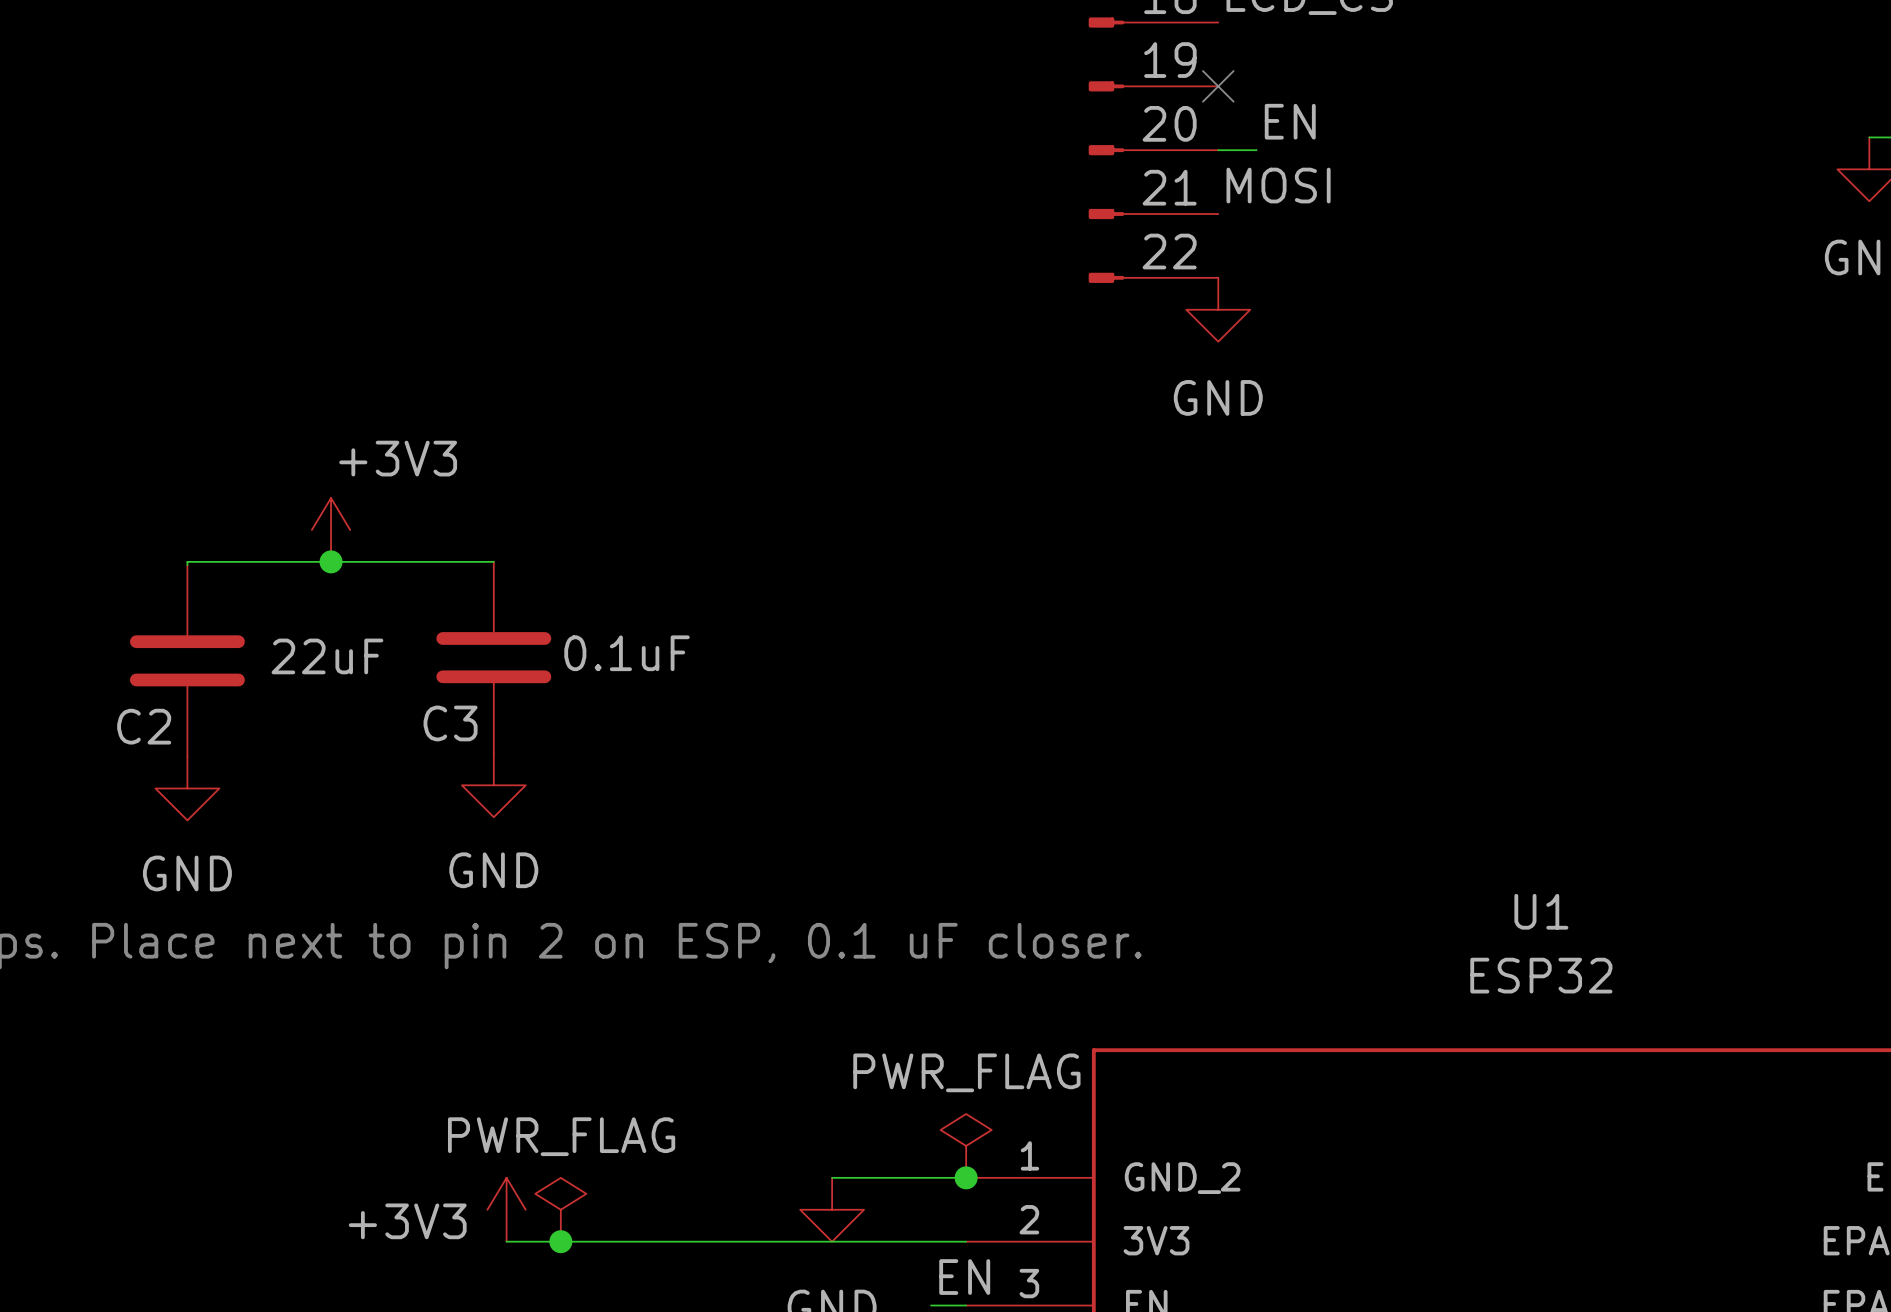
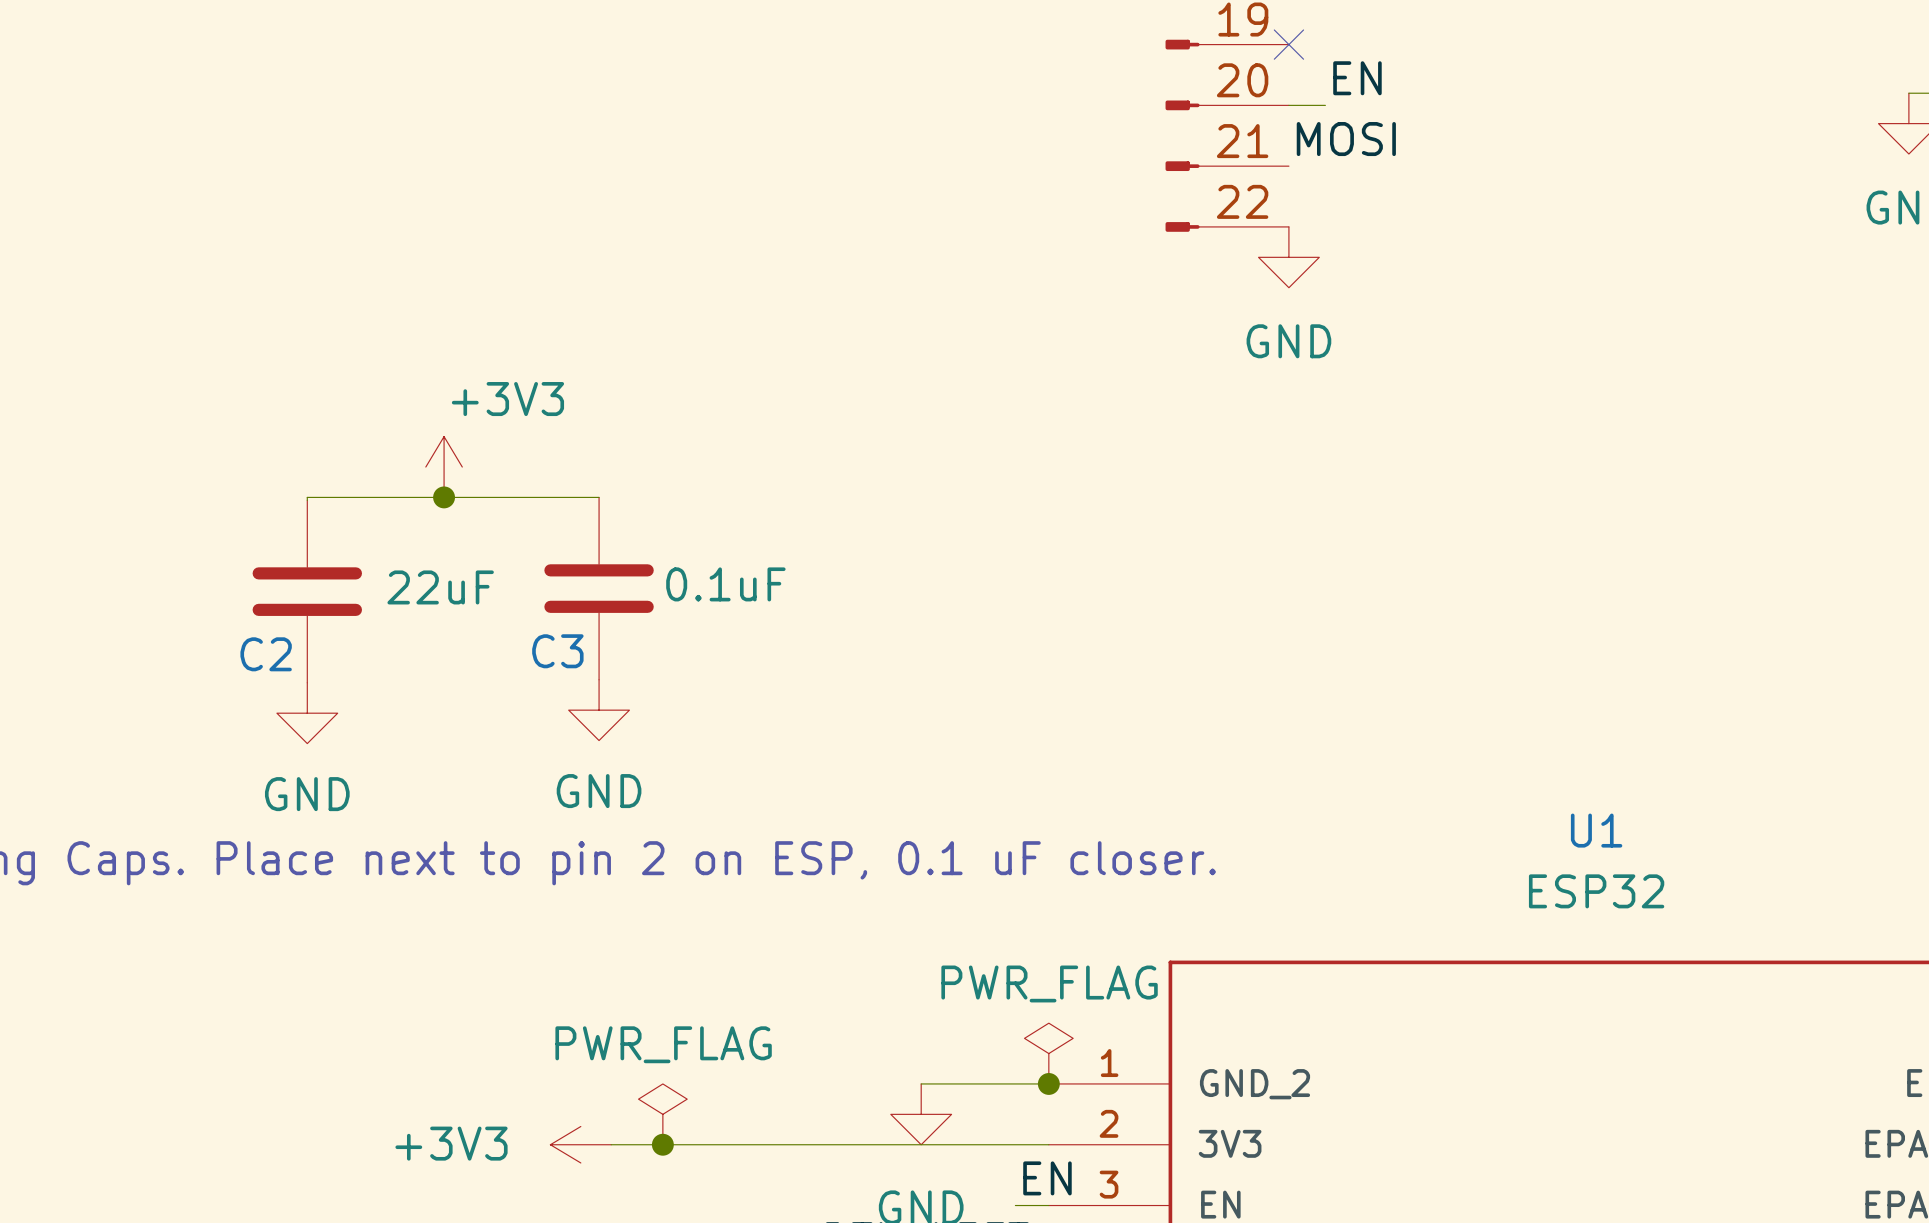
power symbol rotation: 0° (506, 1209) -> 90° counterclockwise (580, 1144)
power symbol position: +3V3 (506, 1209) -> +3V3 (580, 1144)
power symbol text position: +3V3 (407, 1221) -> +3V3 (451, 1143)

